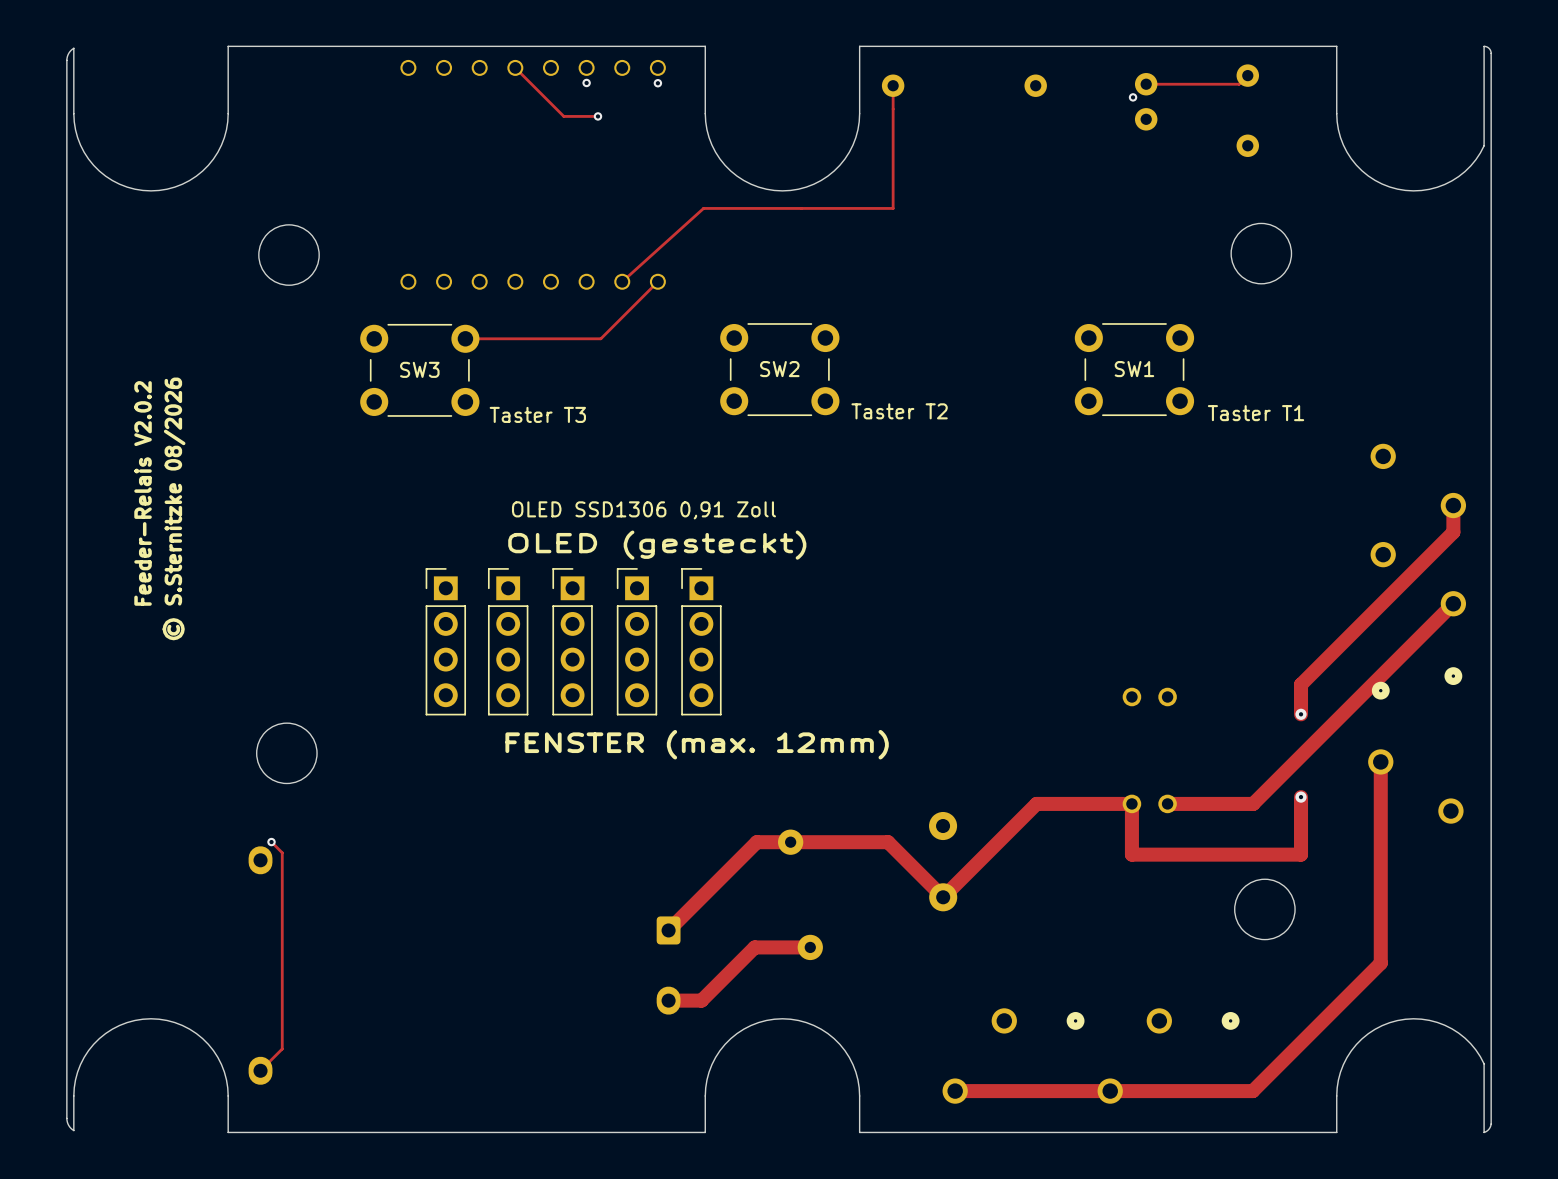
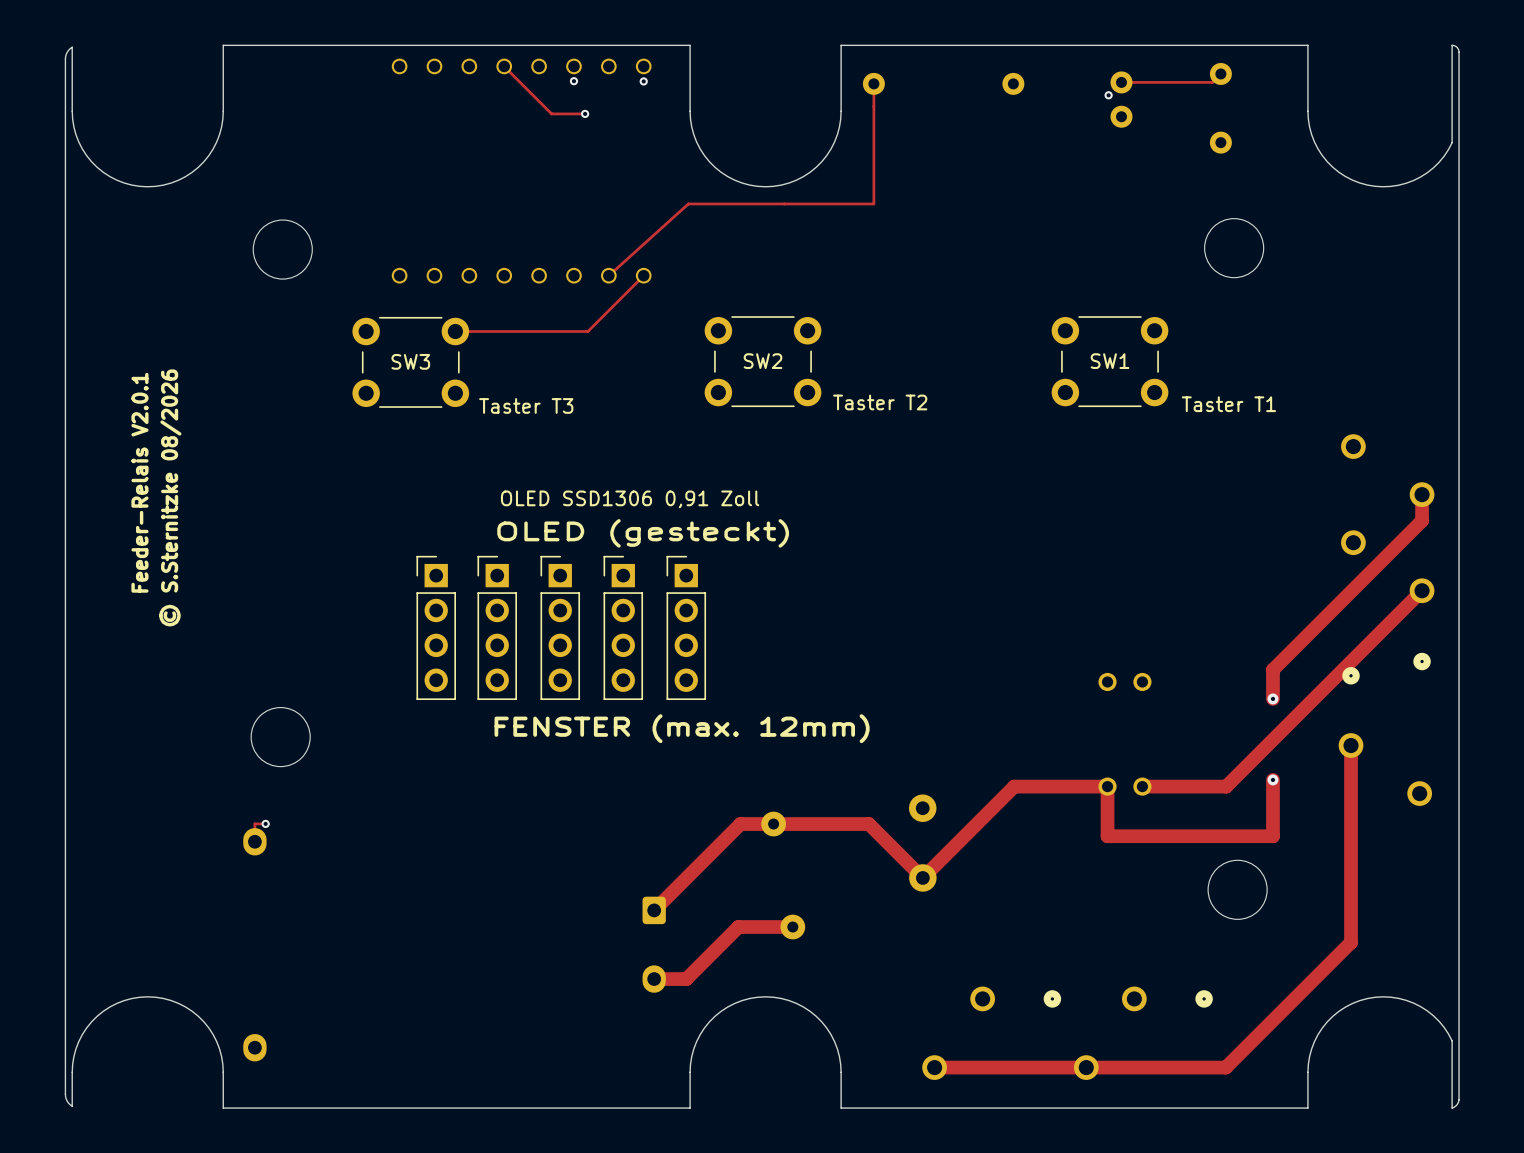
text: Feeder-Relais V2.0.2 (143, 493) -> Feeder-Relais V2.0.1 (139, 482)
track: (271, 842) (282, 852) (282, 1048) (260, 1070) -> (265, 823) (254, 823) (254, 841)

